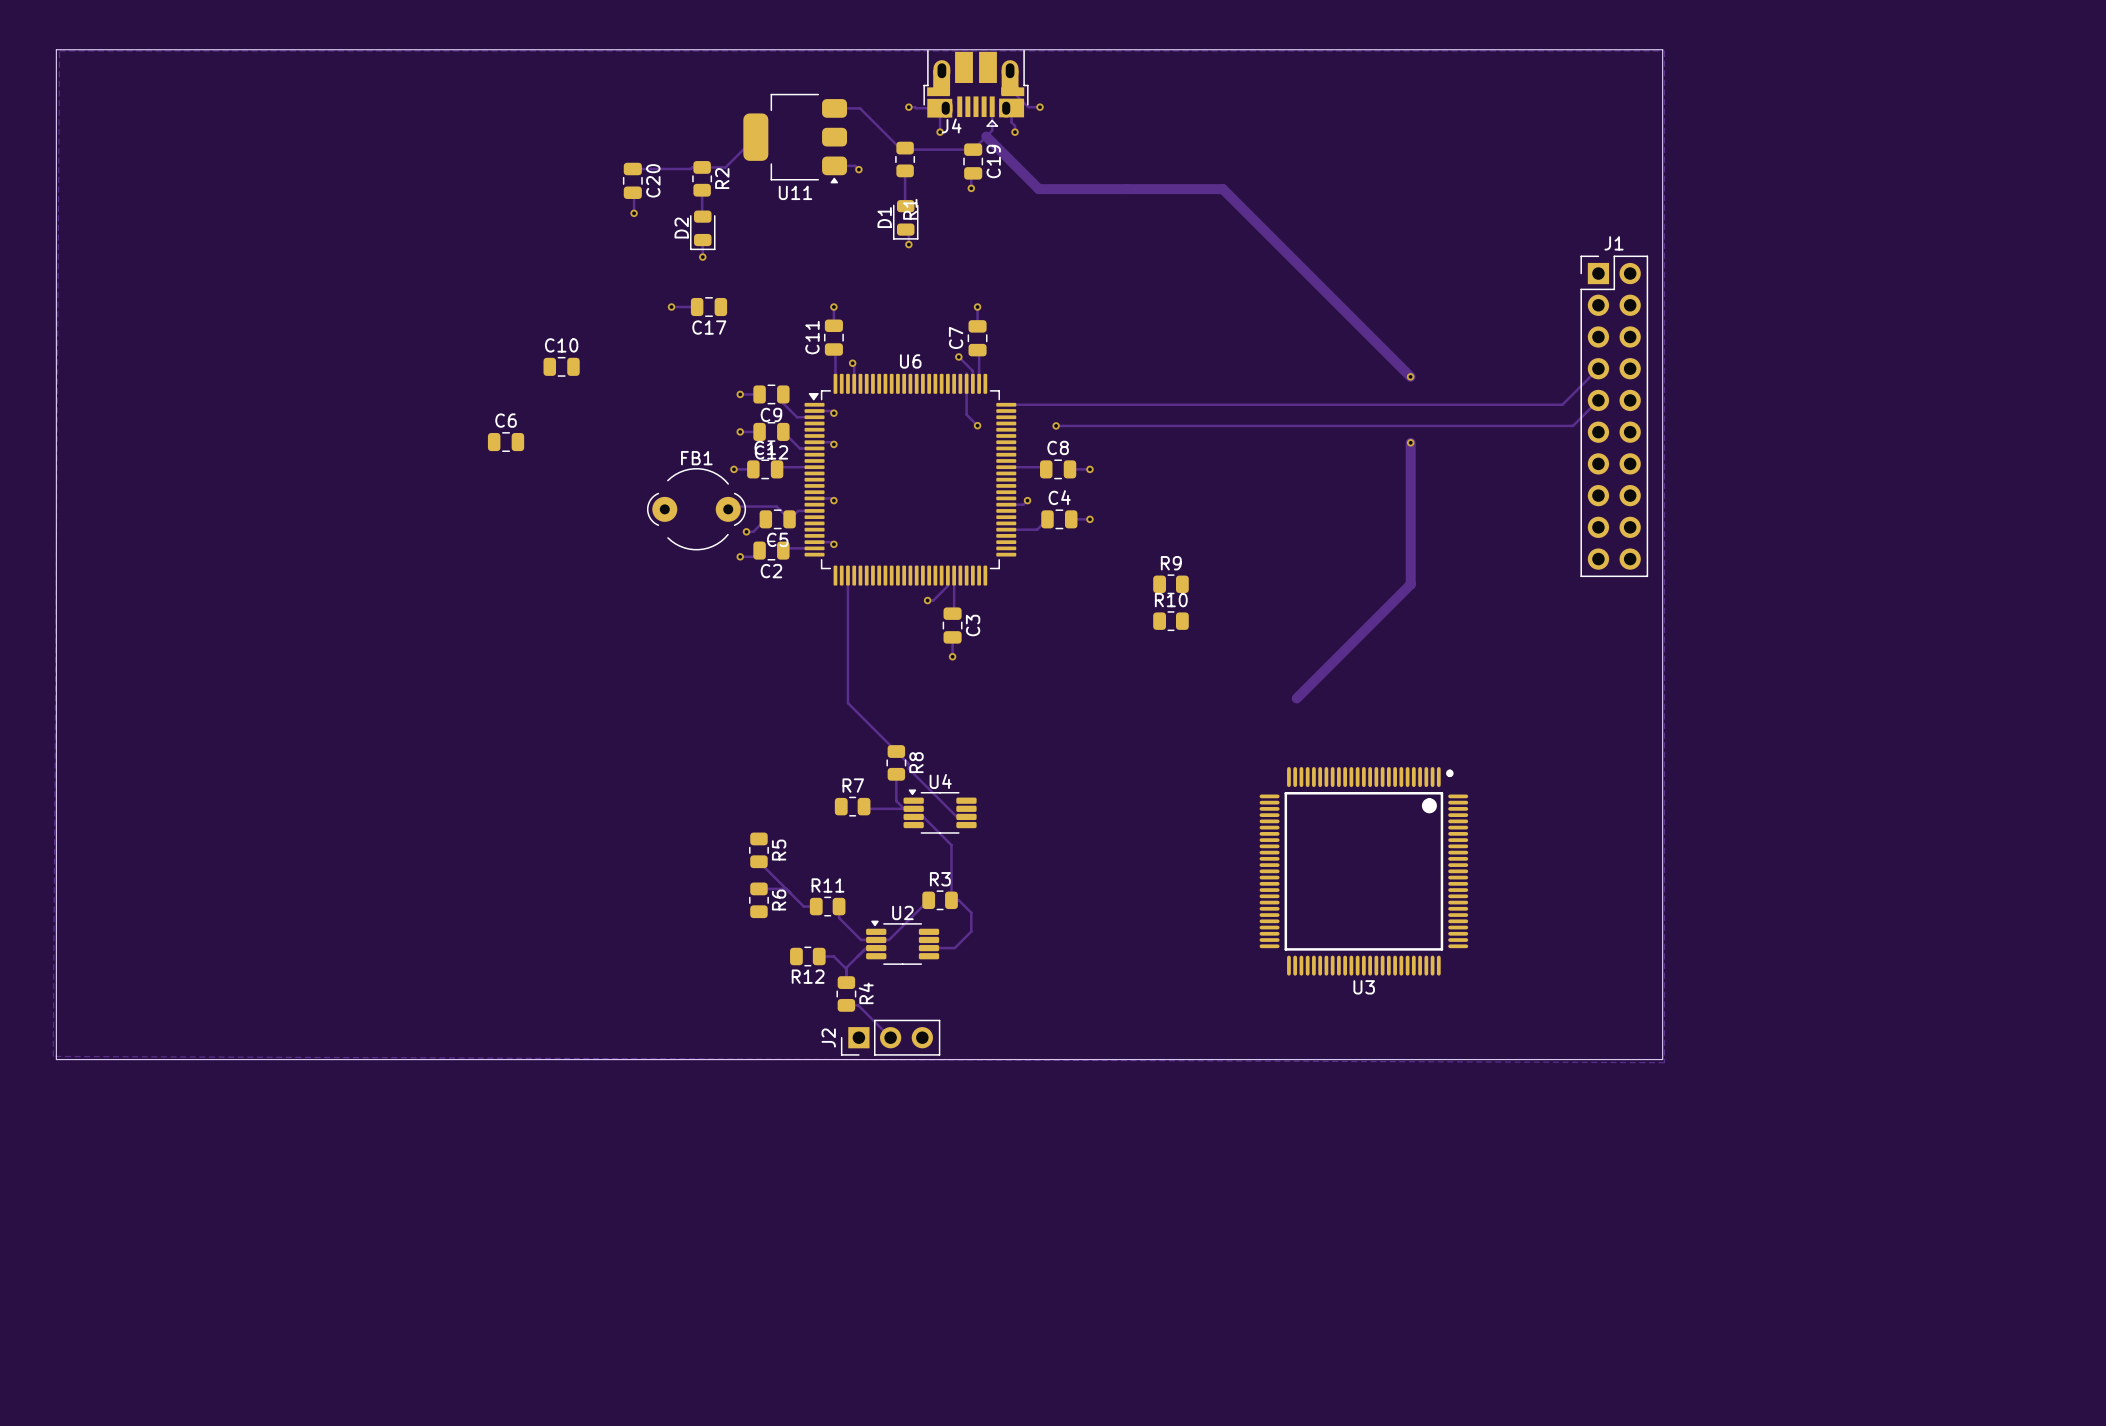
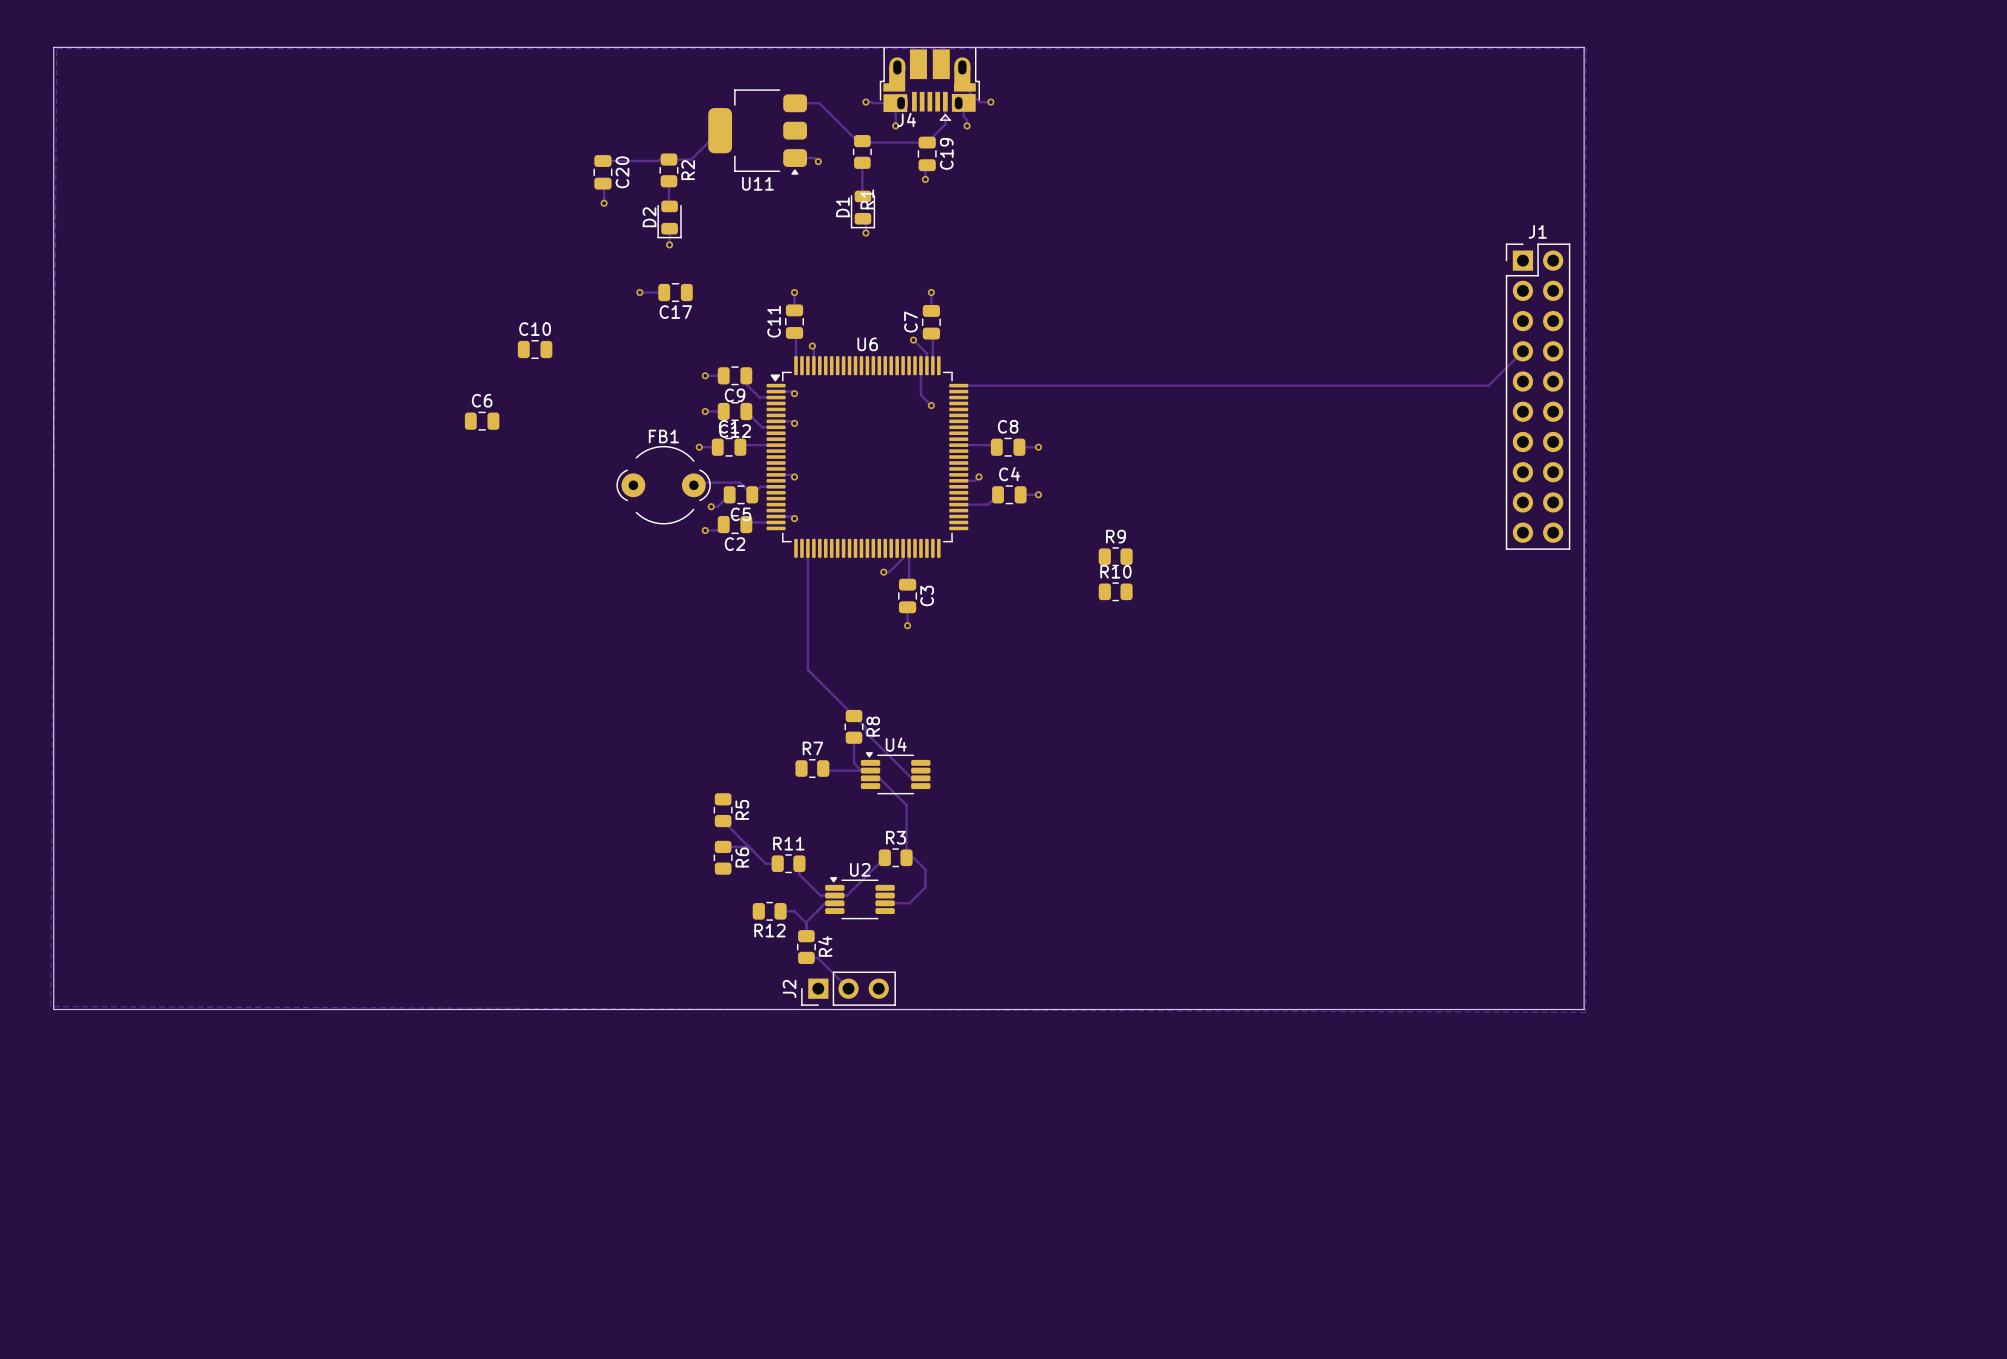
track: (986, 136) (1038, 189) (1222, 189) (1410, 376) -> none
via: (1410, 376) -> none
track: (1598, 400) (1572, 425) (1056, 425) -> none
via: (1056, 425) -> none
track: (1410, 442) (1410, 584) (1296, 698) -> none
via: (1410, 442) -> none
U3: (1363, 871) -> none

